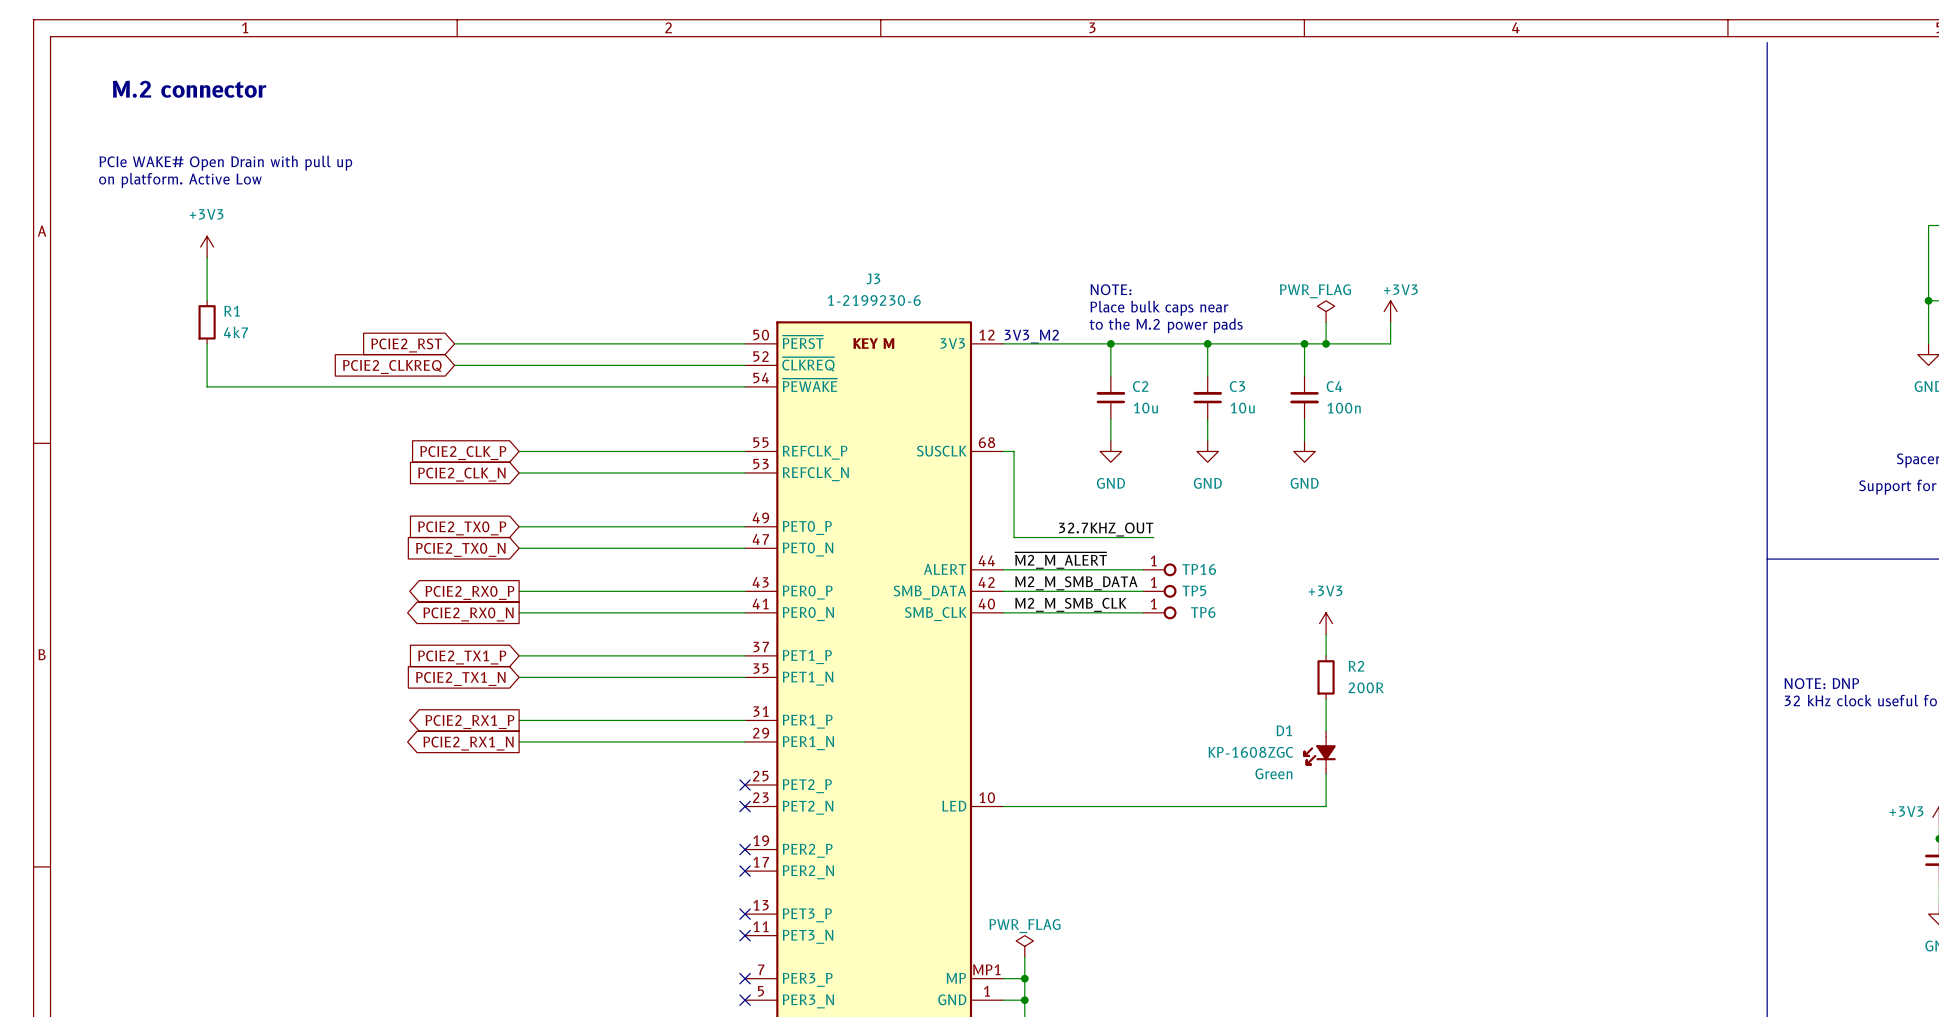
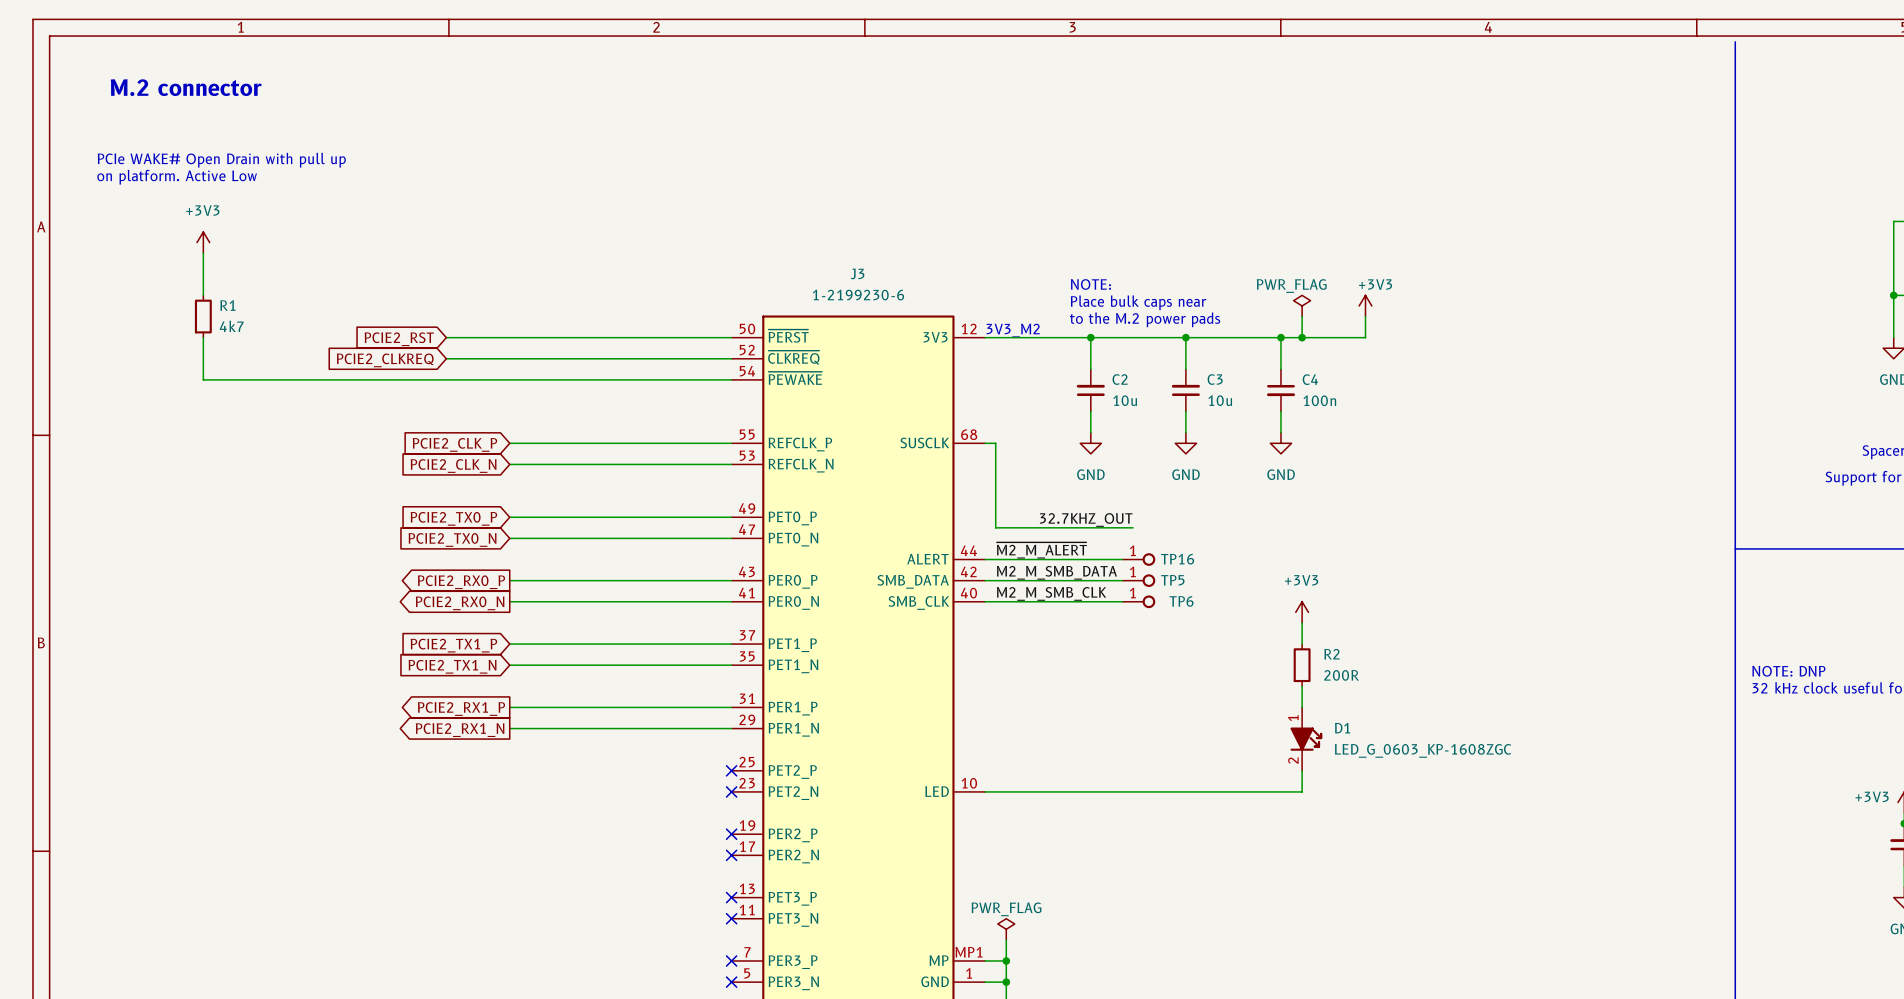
J3 text: KEY M (873, 343) -> none
D1 name position: D1 (1284, 730) -> D1 (1342, 728)
D1 symbol: [1303, 731, 1336, 775] -> [1290, 707, 1323, 771]
D1 text: KP-1608ZGC (1250, 752) -> none
D1 value: none -> LED_G_0603_KP-1608ZGC (1423, 750)
D1 text: Green (1273, 773) -> none

